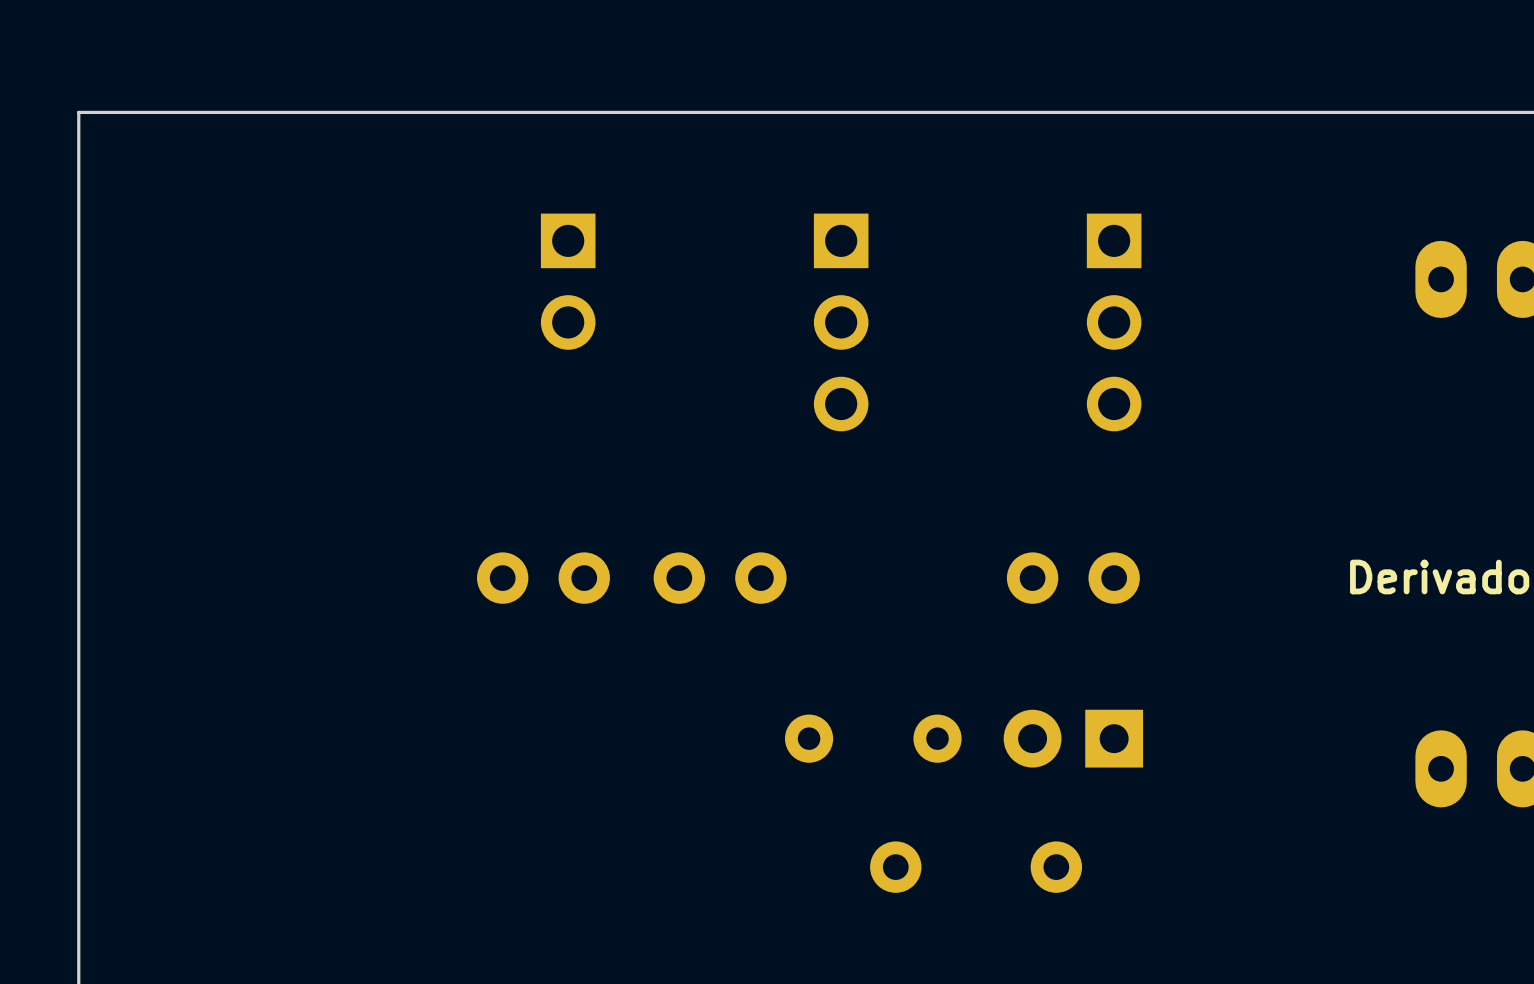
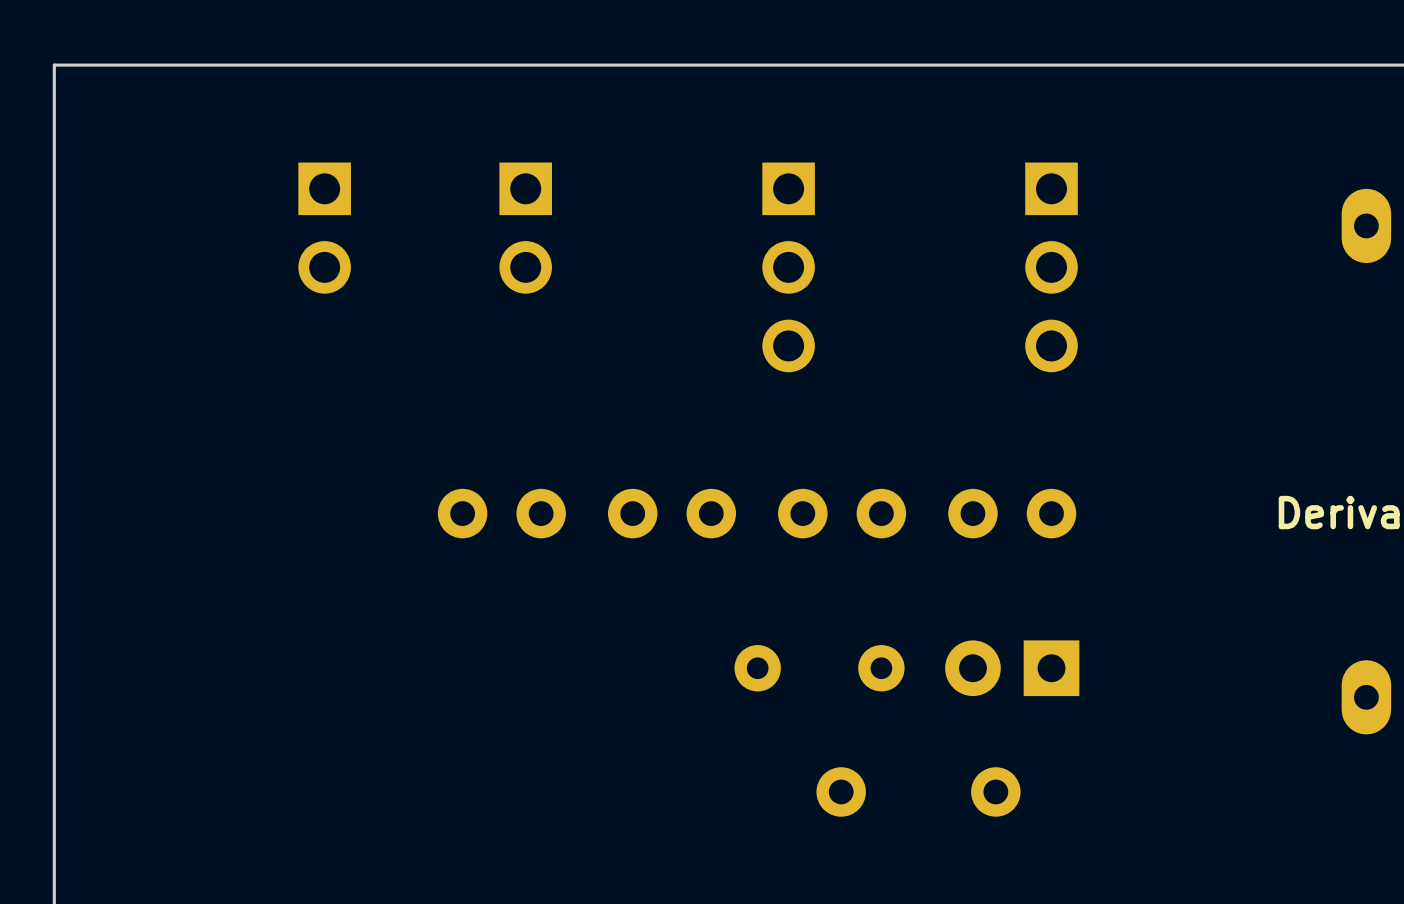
part: none -> (324, 228)
part: none -> (842, 513)

